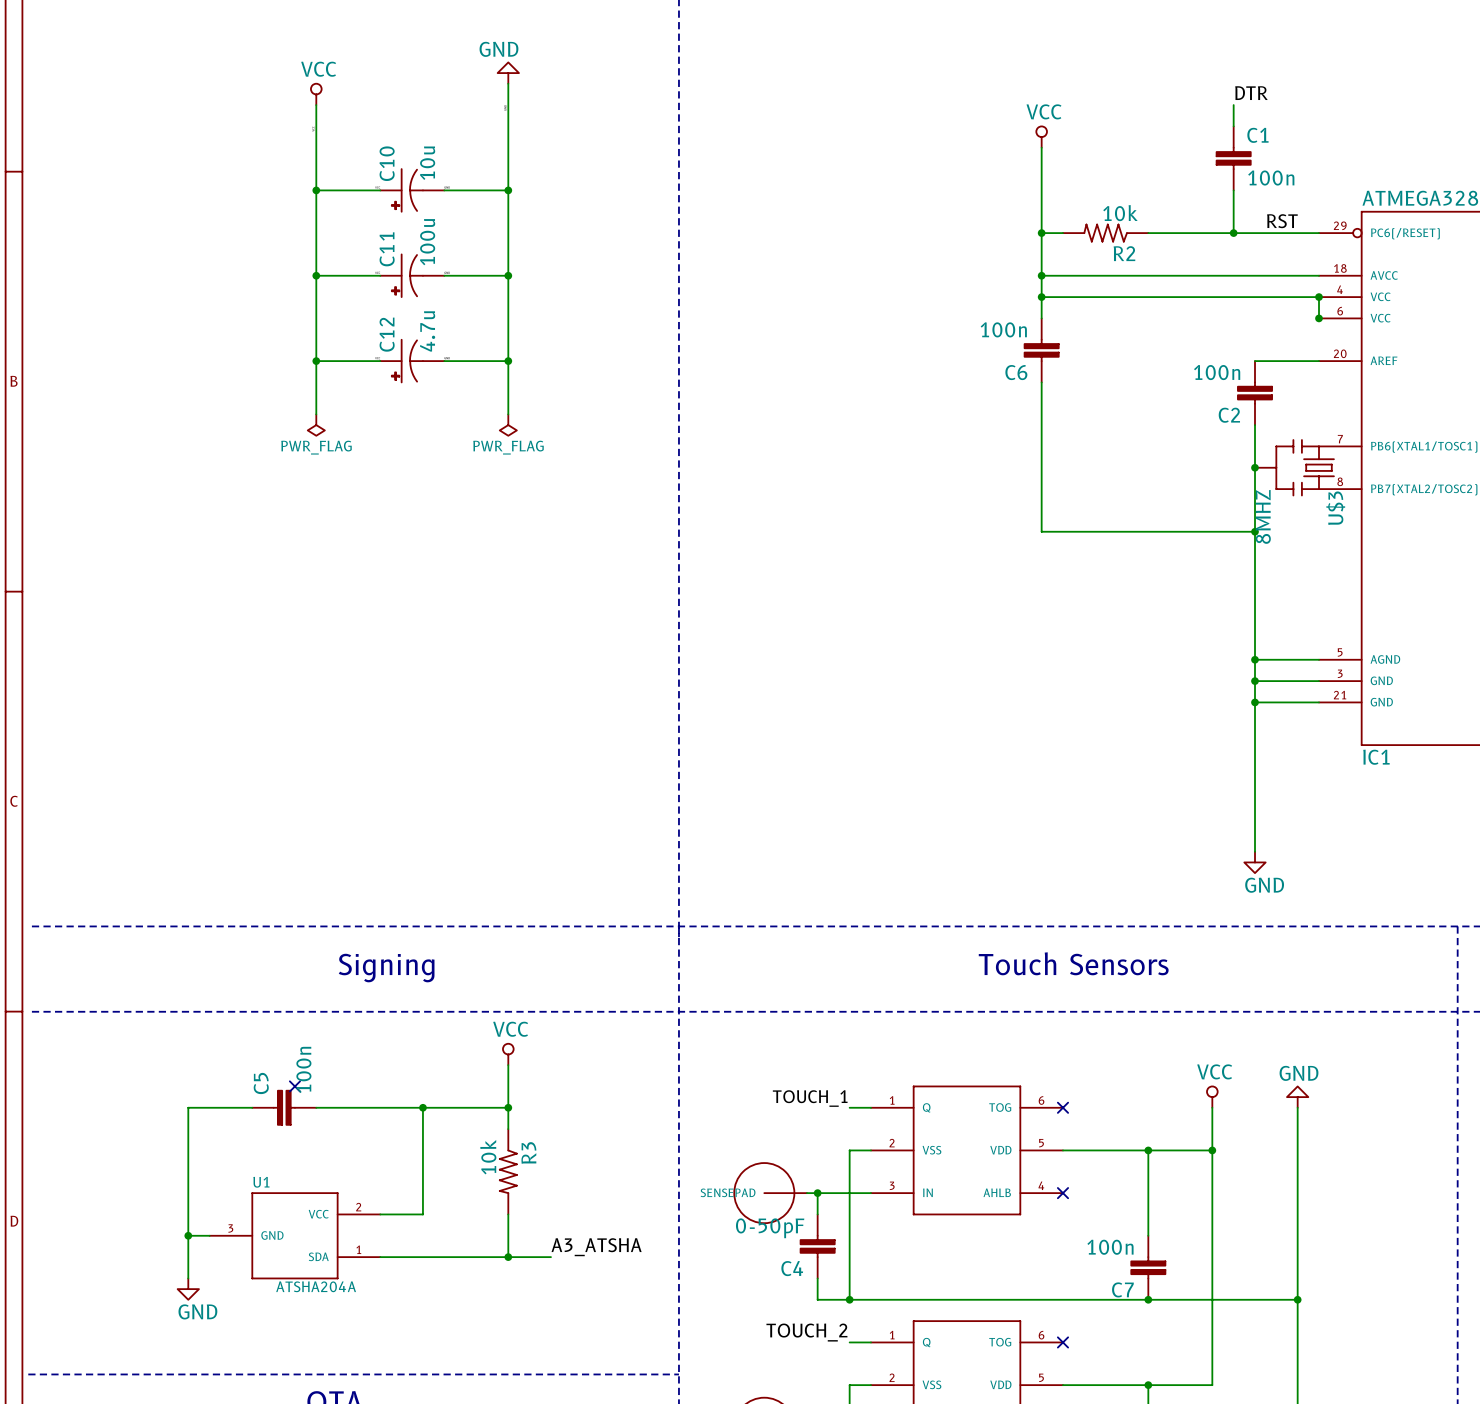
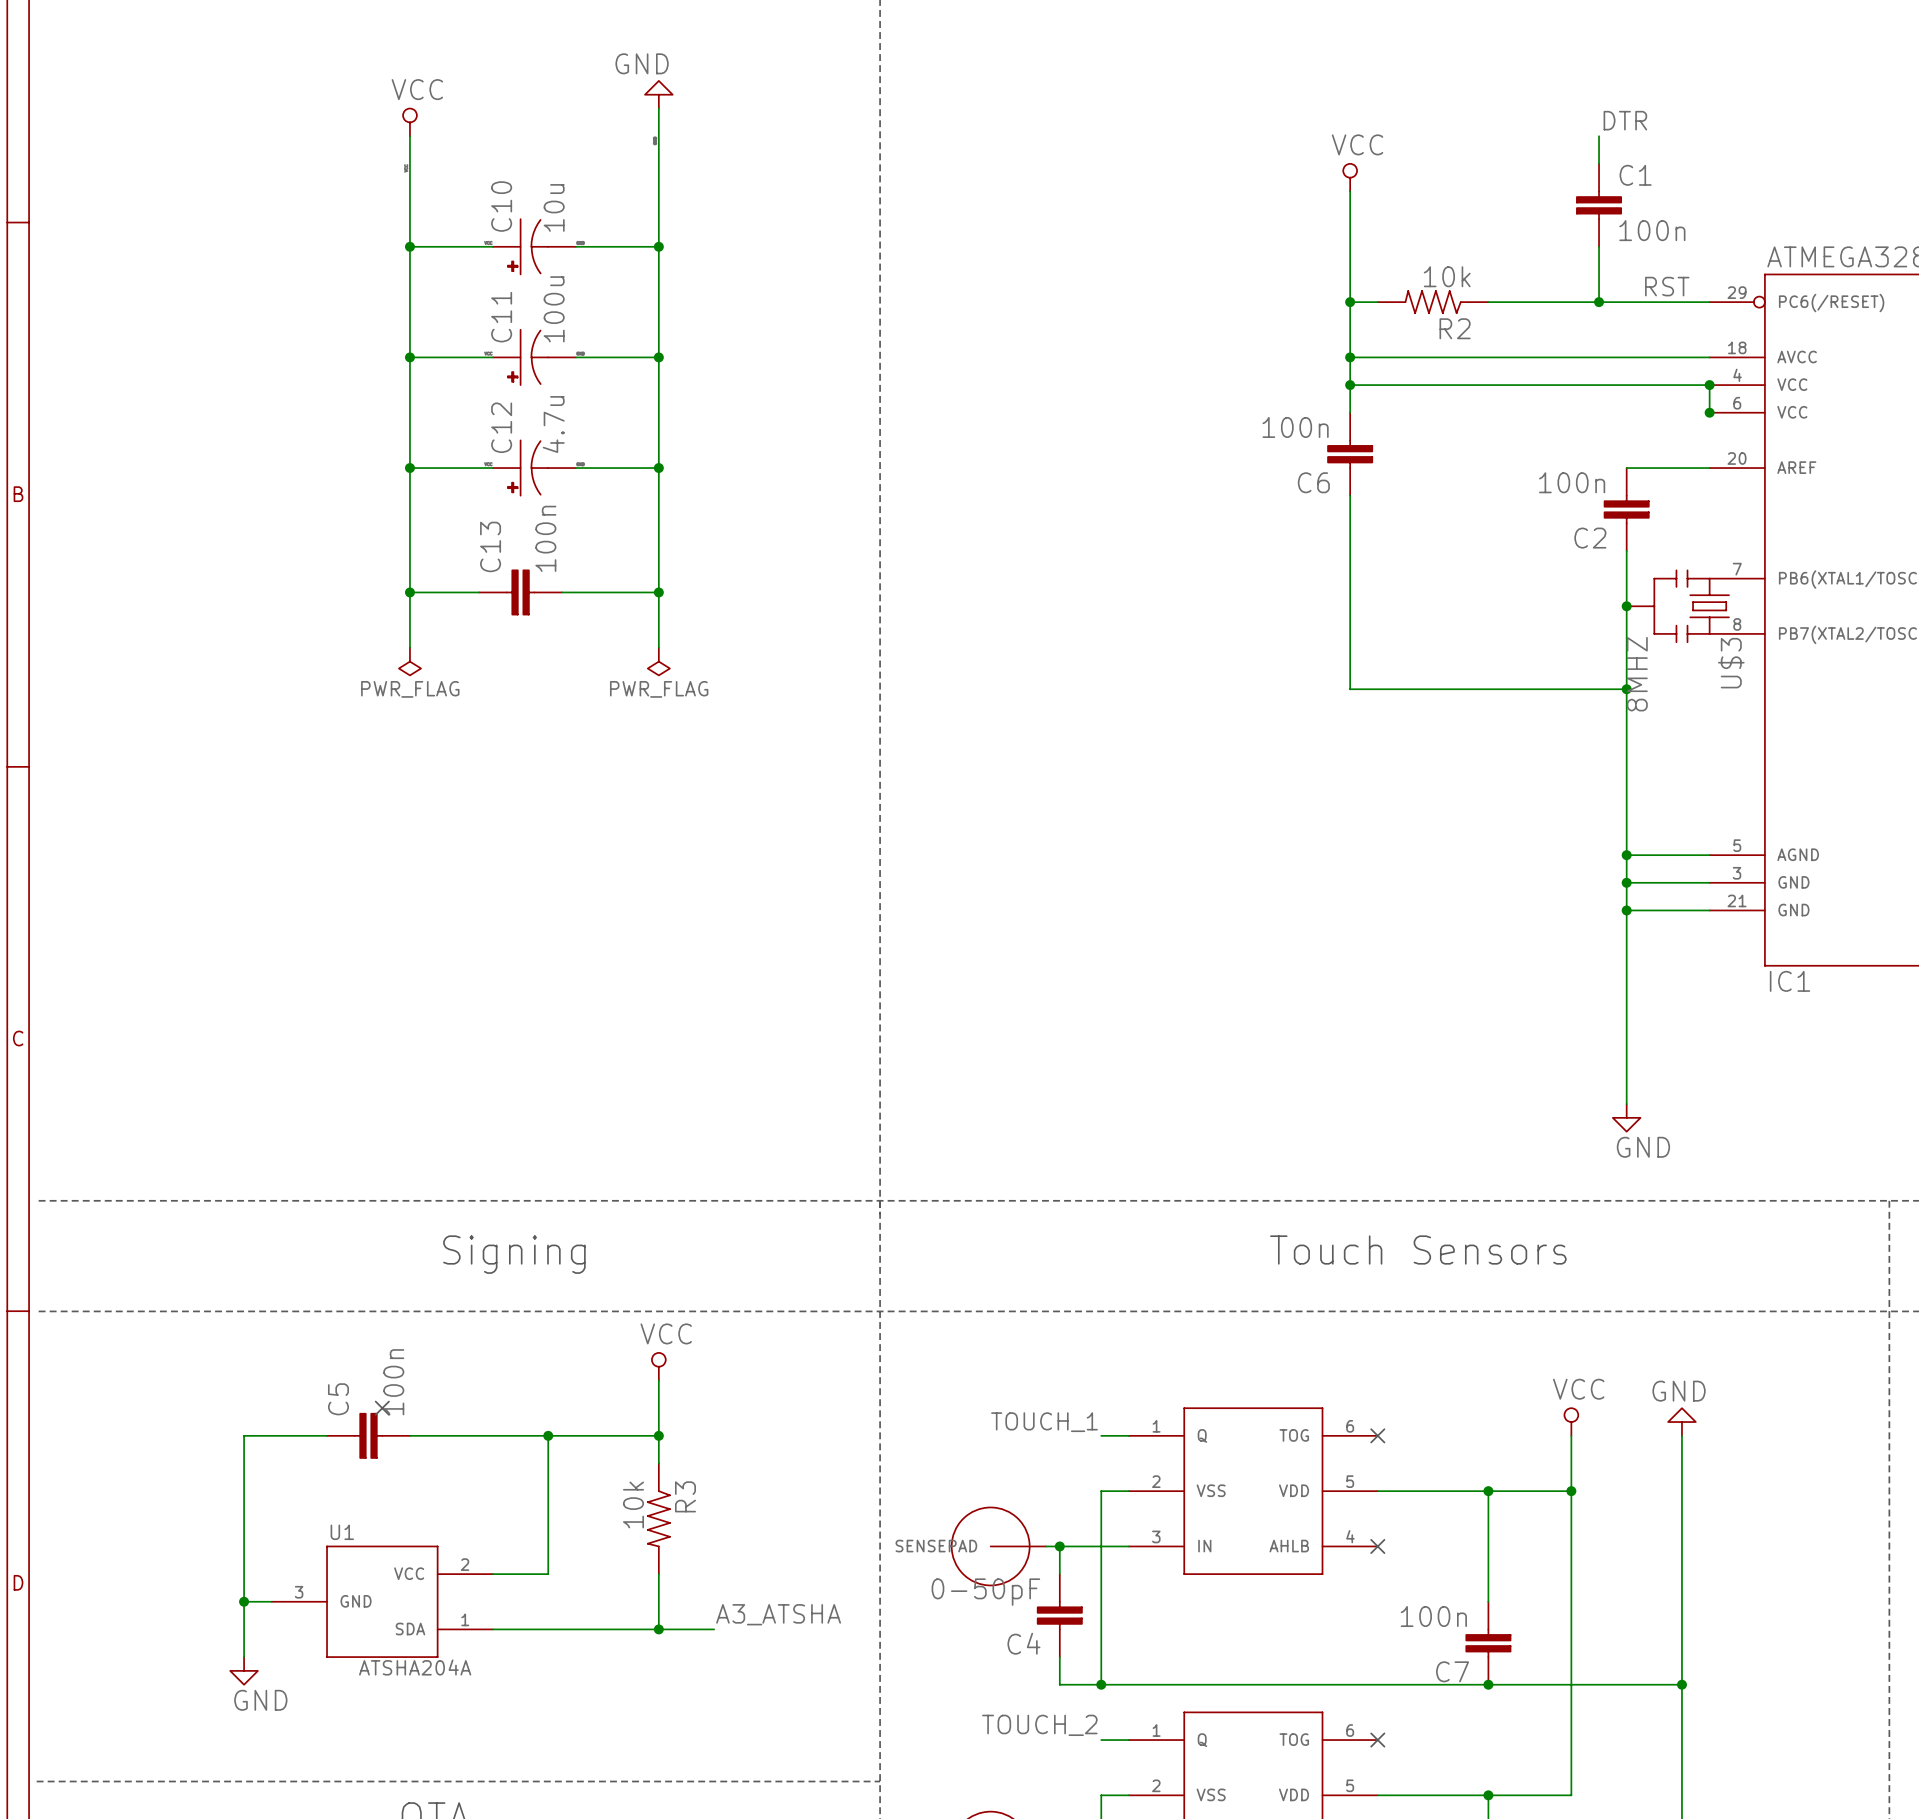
wire: none -> (409, 537) (409, 647)
wire: none -> (658, 537) (658, 647)
power symbol position: PWR_FLAG (316, 425) -> PWR_FLAG (409, 661)
power symbol position: PWR_FLAG (508, 425) -> PWR_FLAG (658, 661)
wire: none -> (409, 592) (479, 592)
junction: none -> (409, 592)
C13: none -> 100n (520, 592)
wire: none -> (562, 592) (658, 592)
junction: none -> (658, 592)

